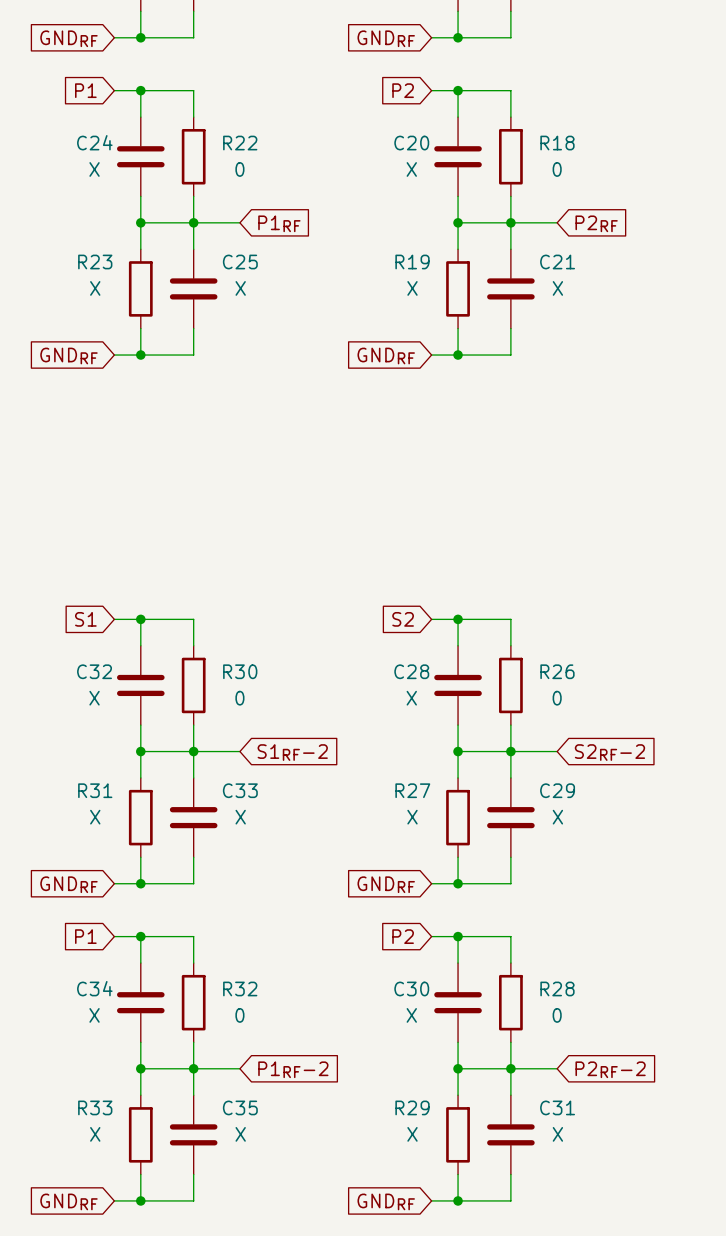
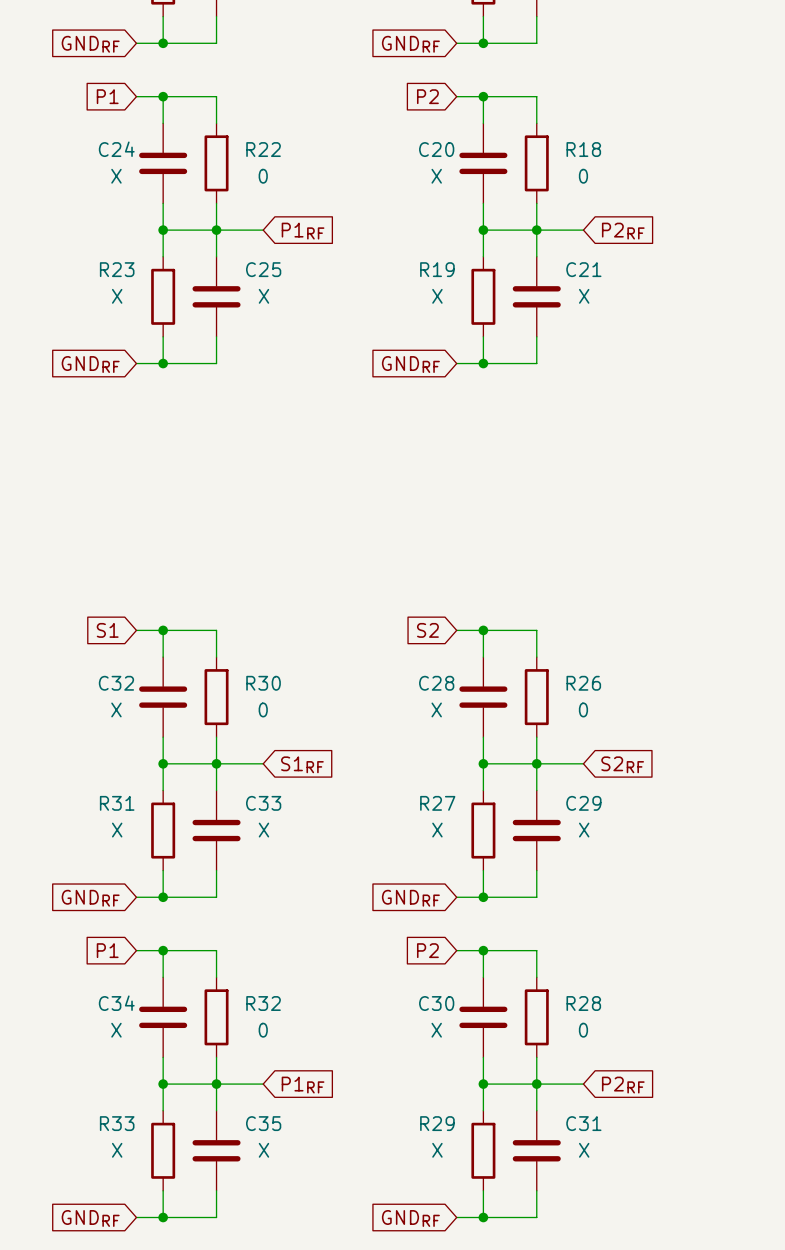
global label: S1RF-2 (292, 752) -> S1RF (302, 764)
global label: S2RF-2 (609, 752) -> S2RF (622, 764)
global label: P1RF-2 (293, 1069) -> P1RF (303, 1085)
global label: P2RF-2 (610, 1069) -> P2RF (623, 1085)

